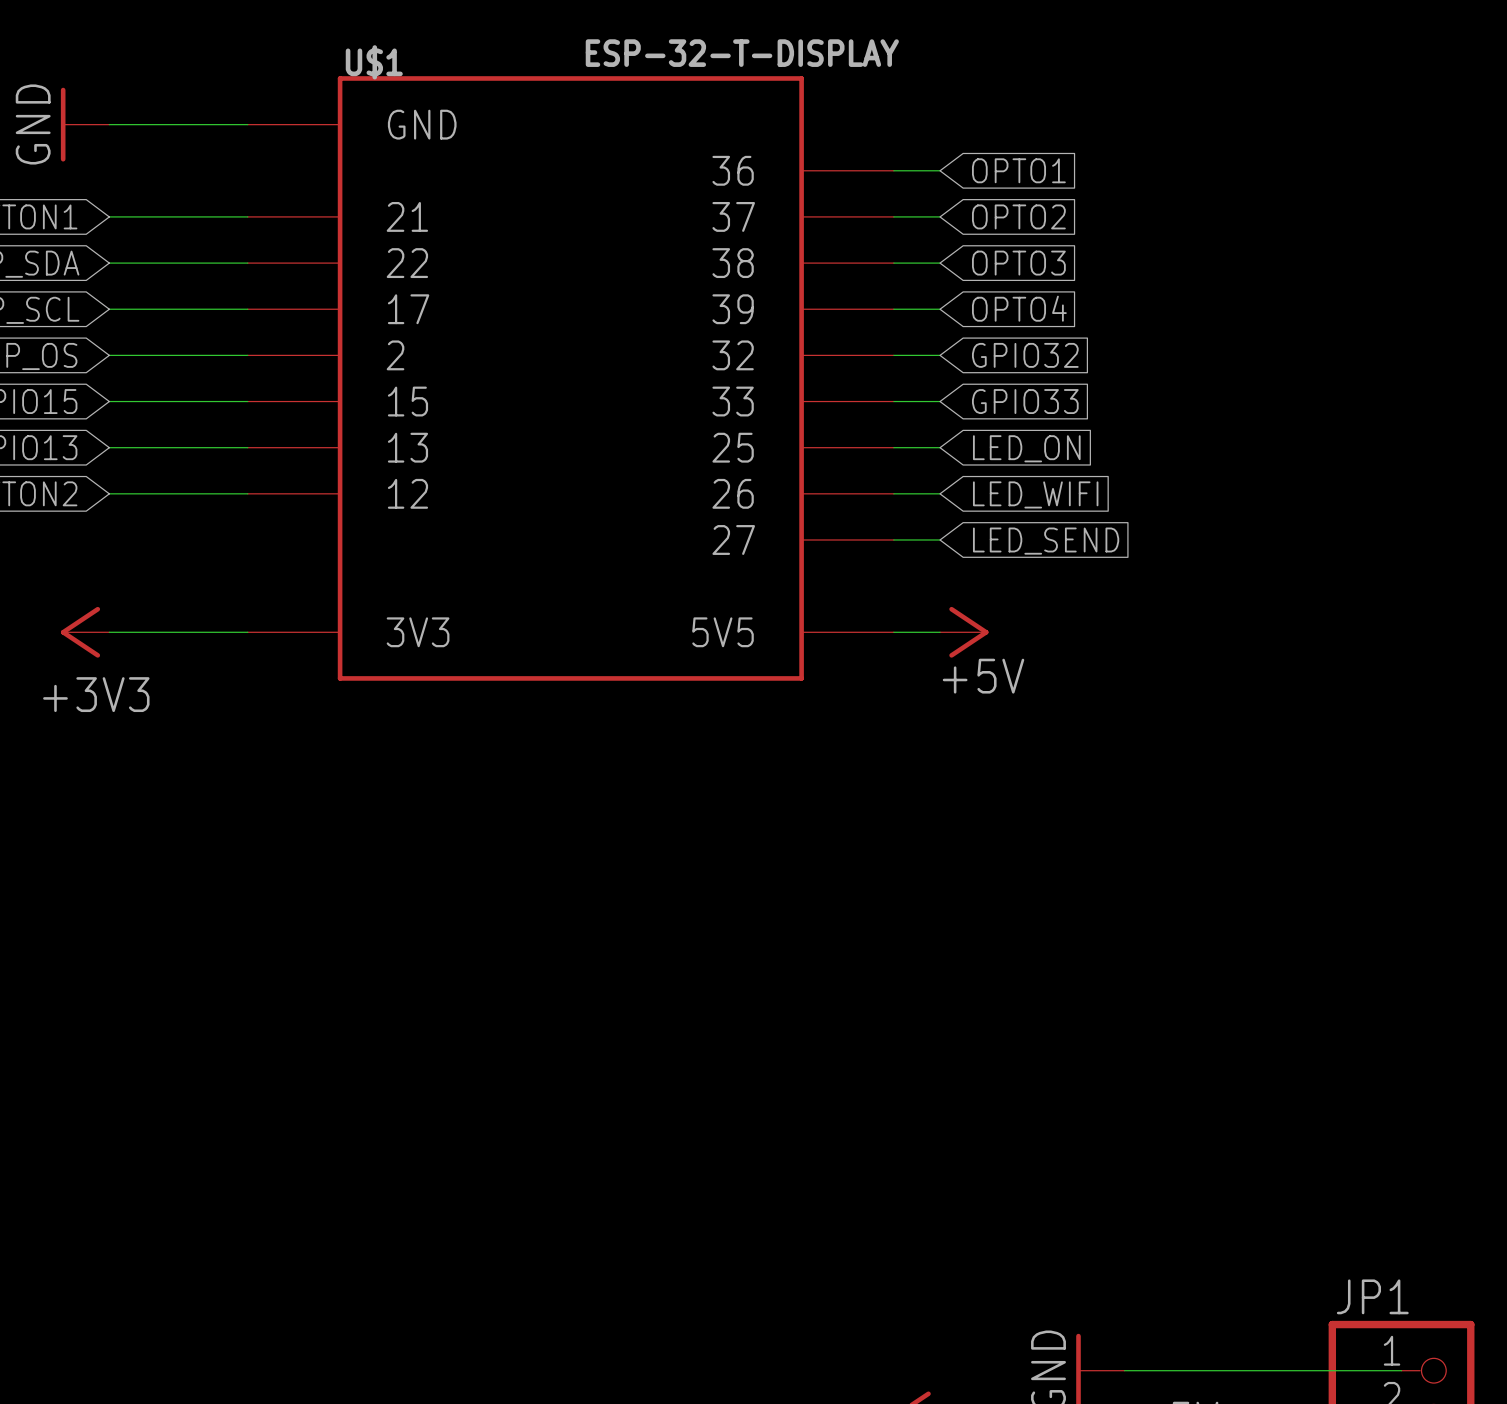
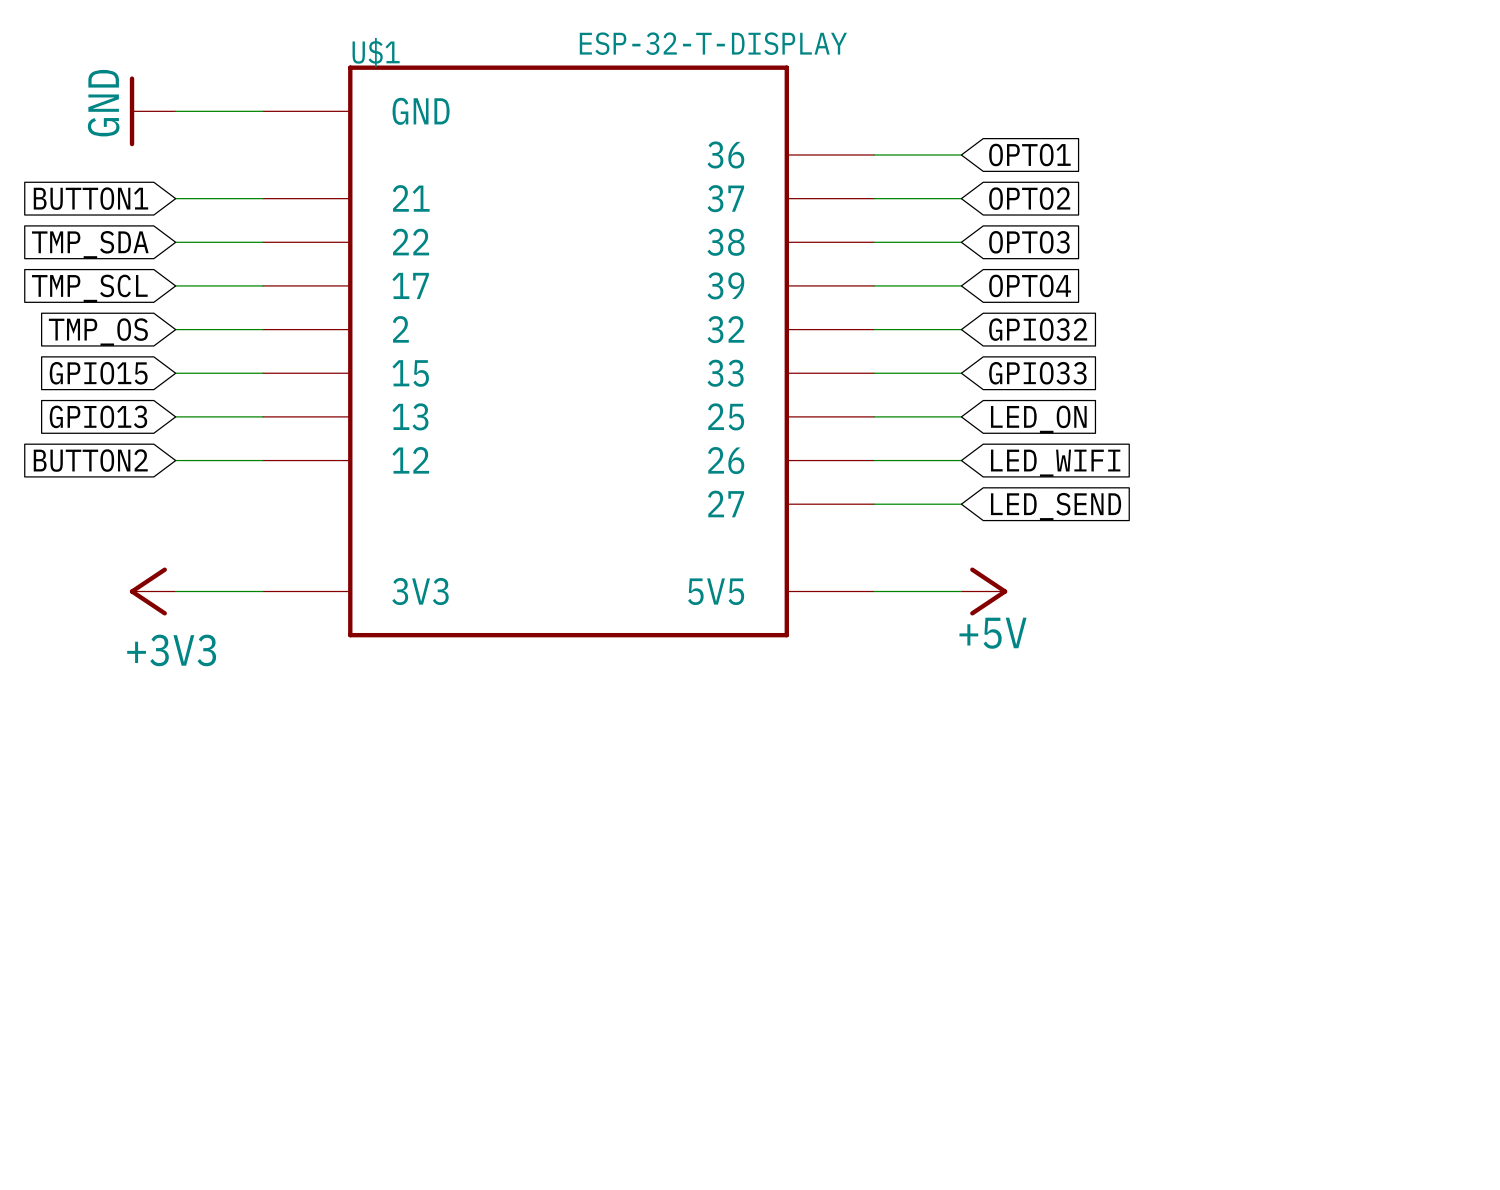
U$1 position: (570, 378) -> (568, 351)

